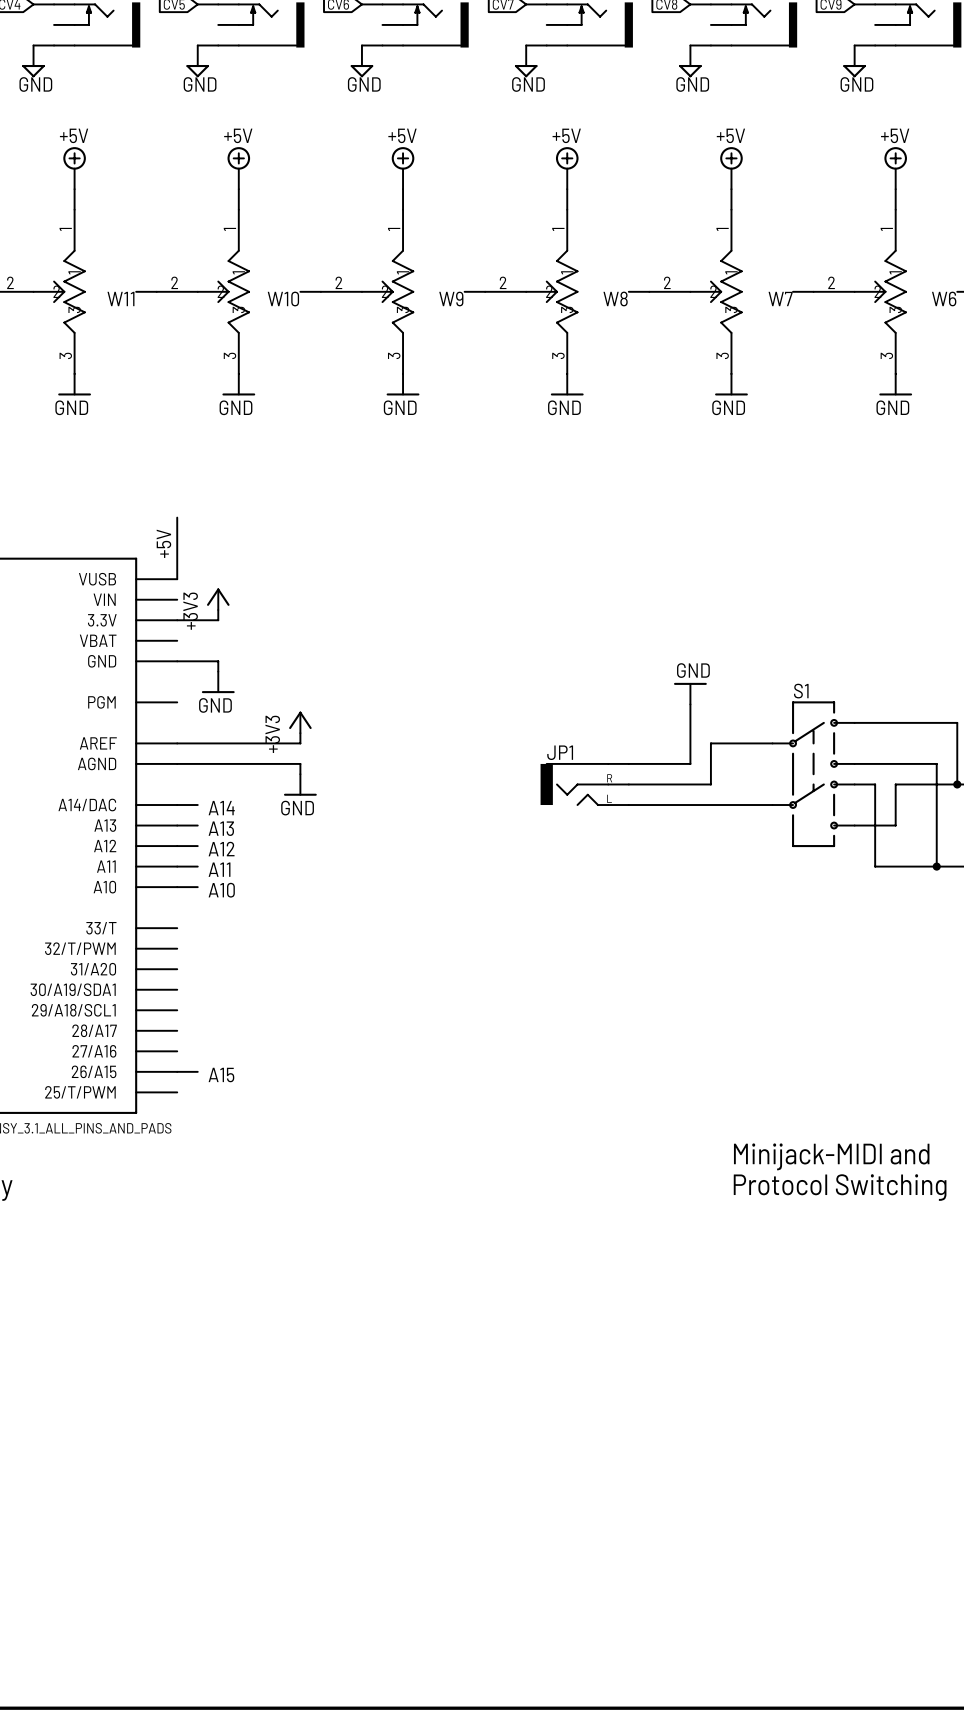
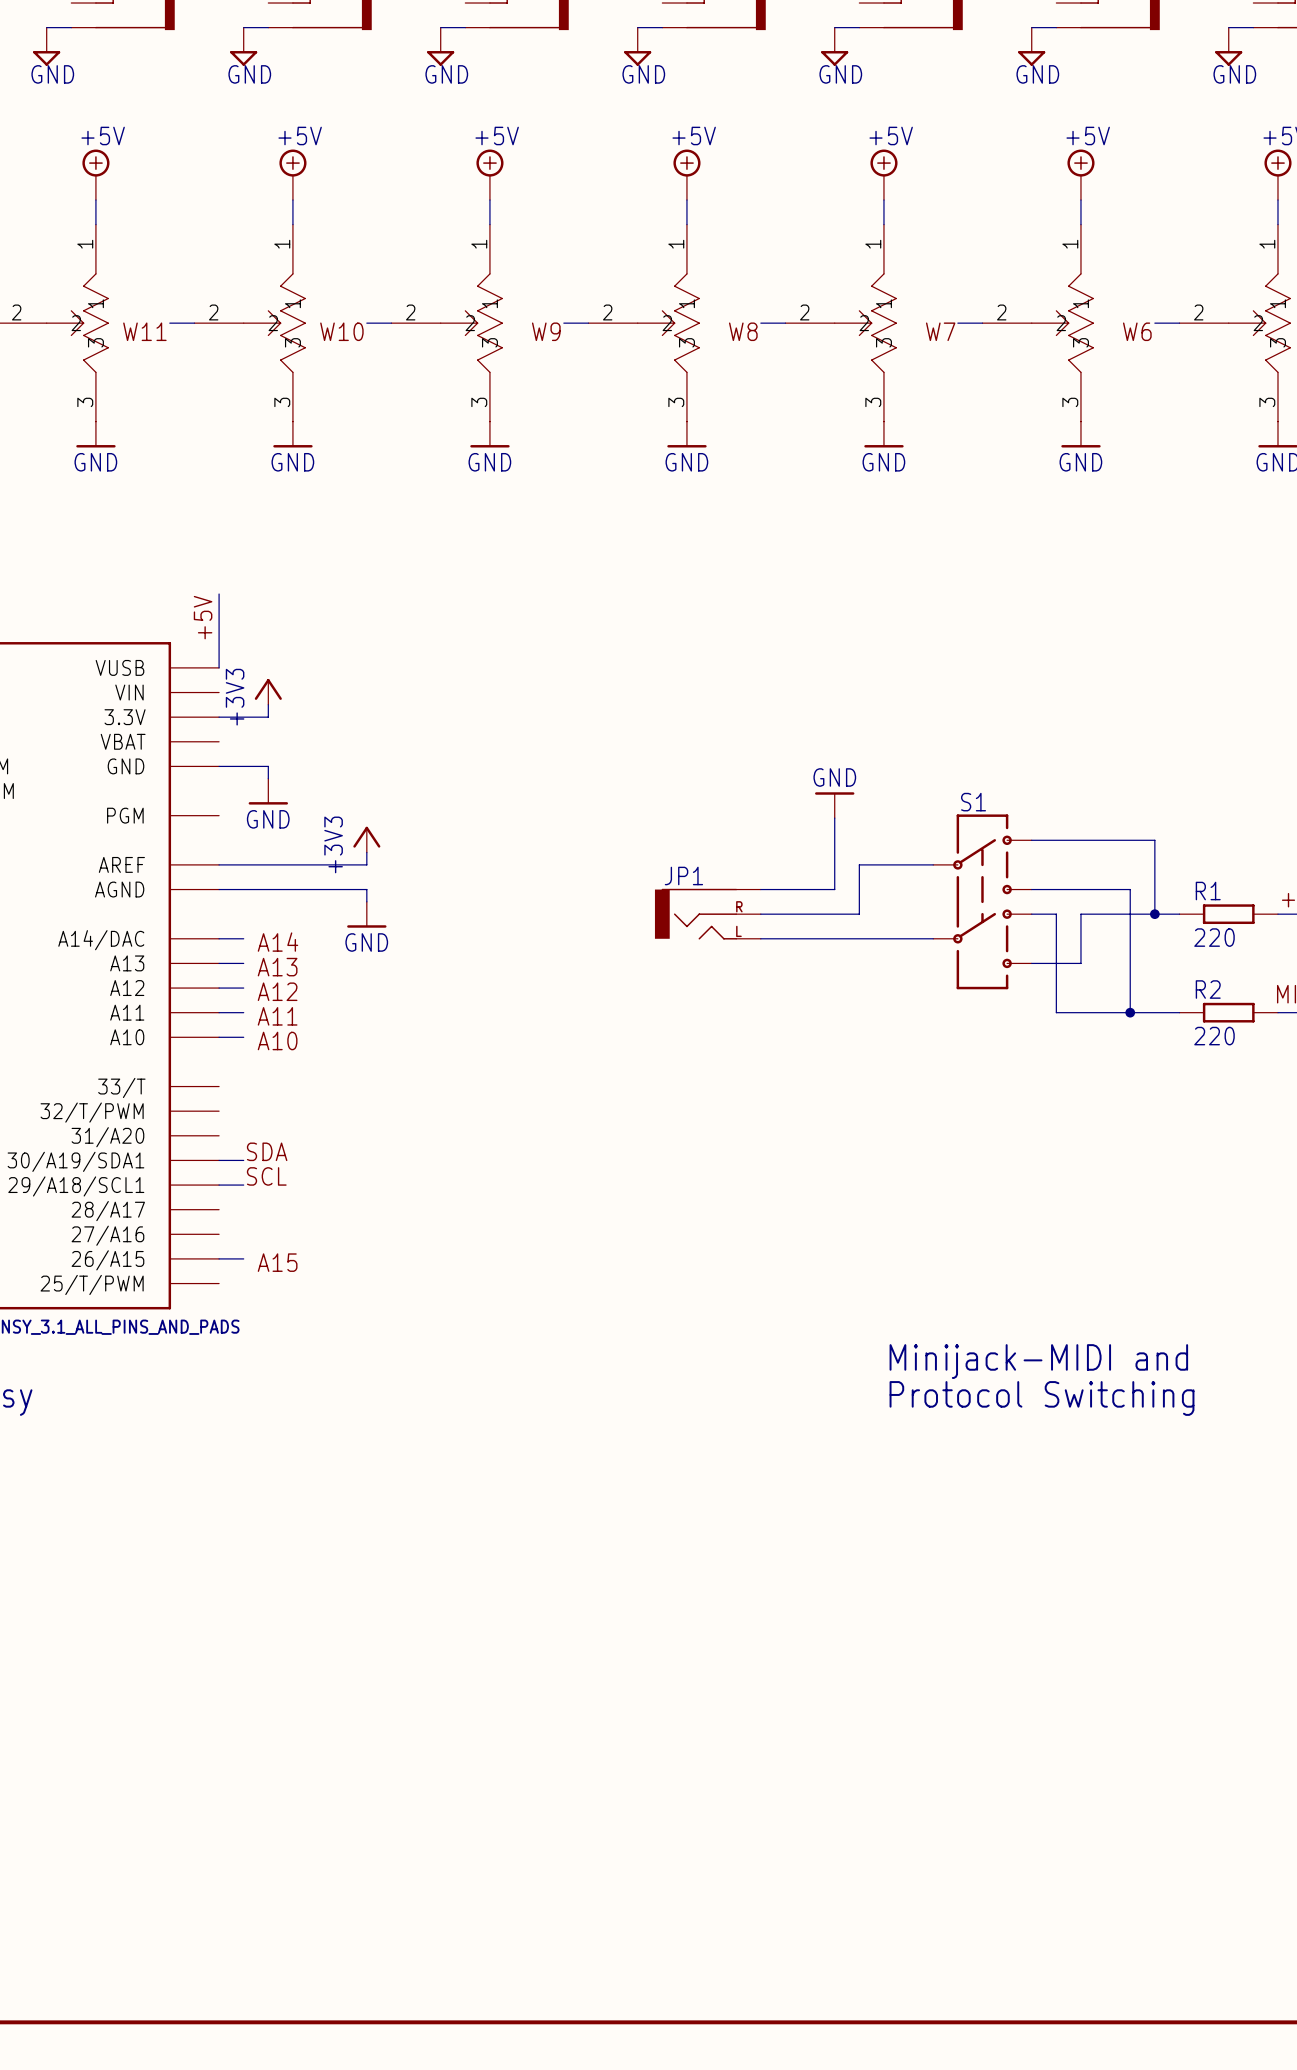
label: none -> SDA (267, 1151)
wire: none -> (219, 1160) (243, 1160)
label: none -> SCL (266, 1176)
wire: none -> (219, 1185) (243, 1185)

